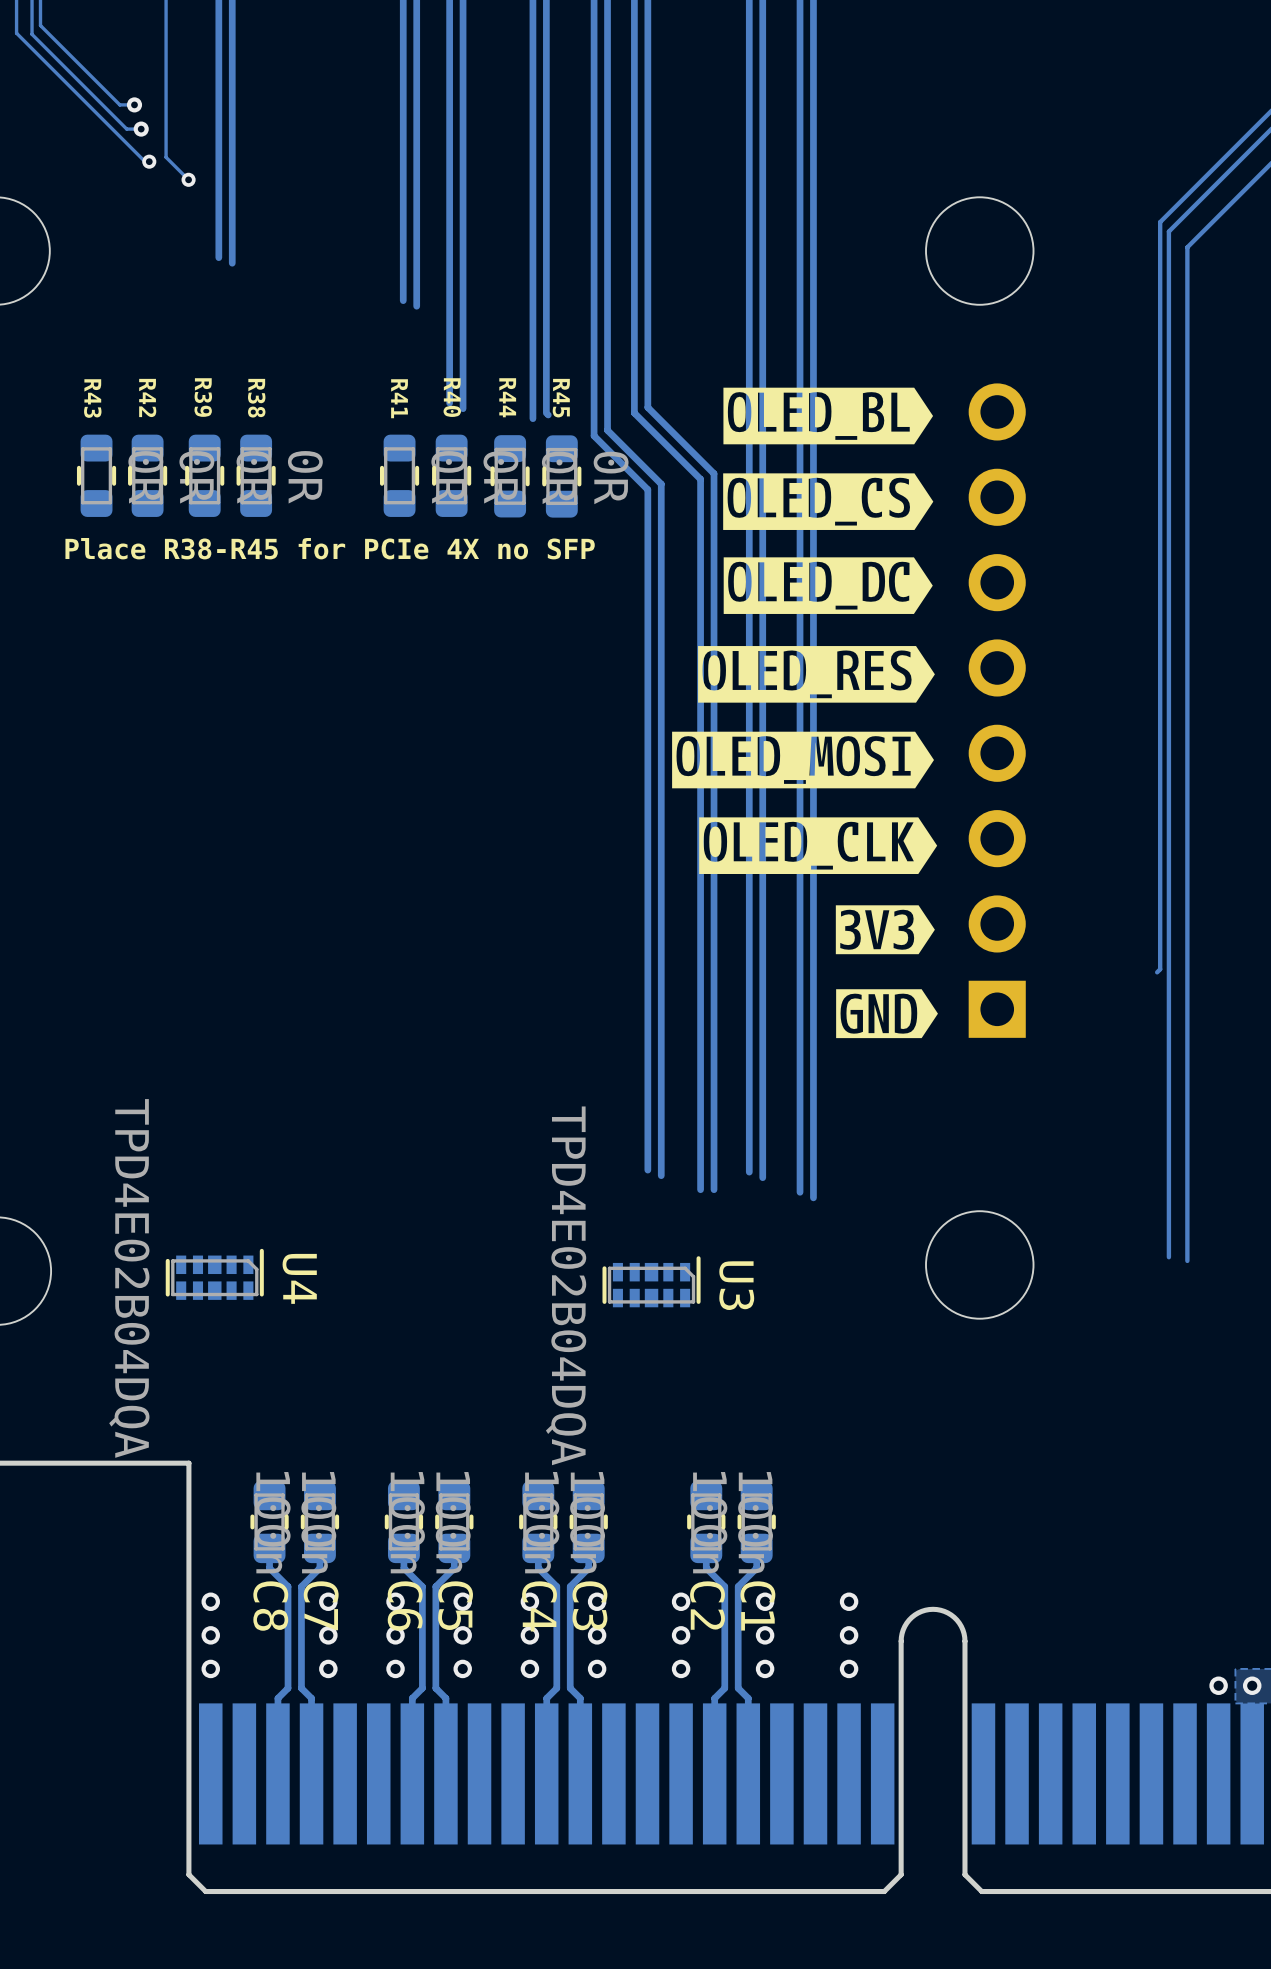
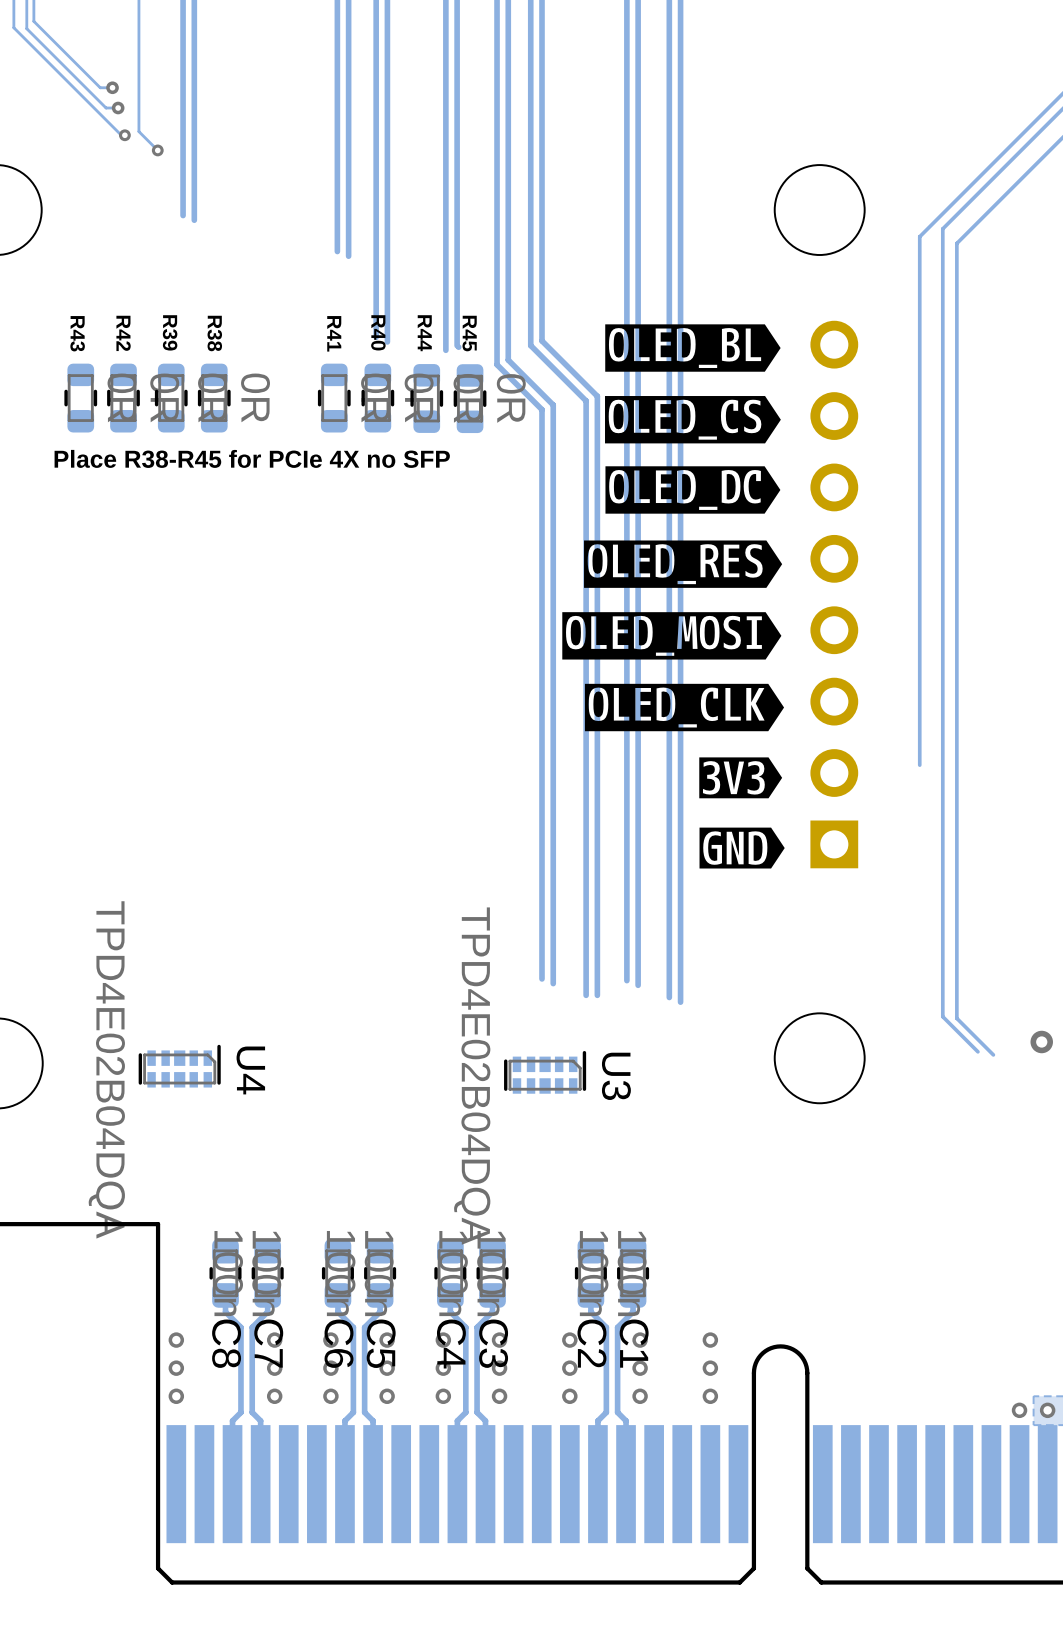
track: (1160, 222) (1160, 969) (1157, 972) -> (970, 185) (919, 236) (919, 765)
track: (1168, 231) (1168, 1257) -> (977, 193) (942, 228) (942, 1016) (977, 1051)
track: (1187, 247) (1187, 1260) -> (993, 206) (956, 243) (956, 1018) (993, 1054)
via: none -> (1041, 1041)

